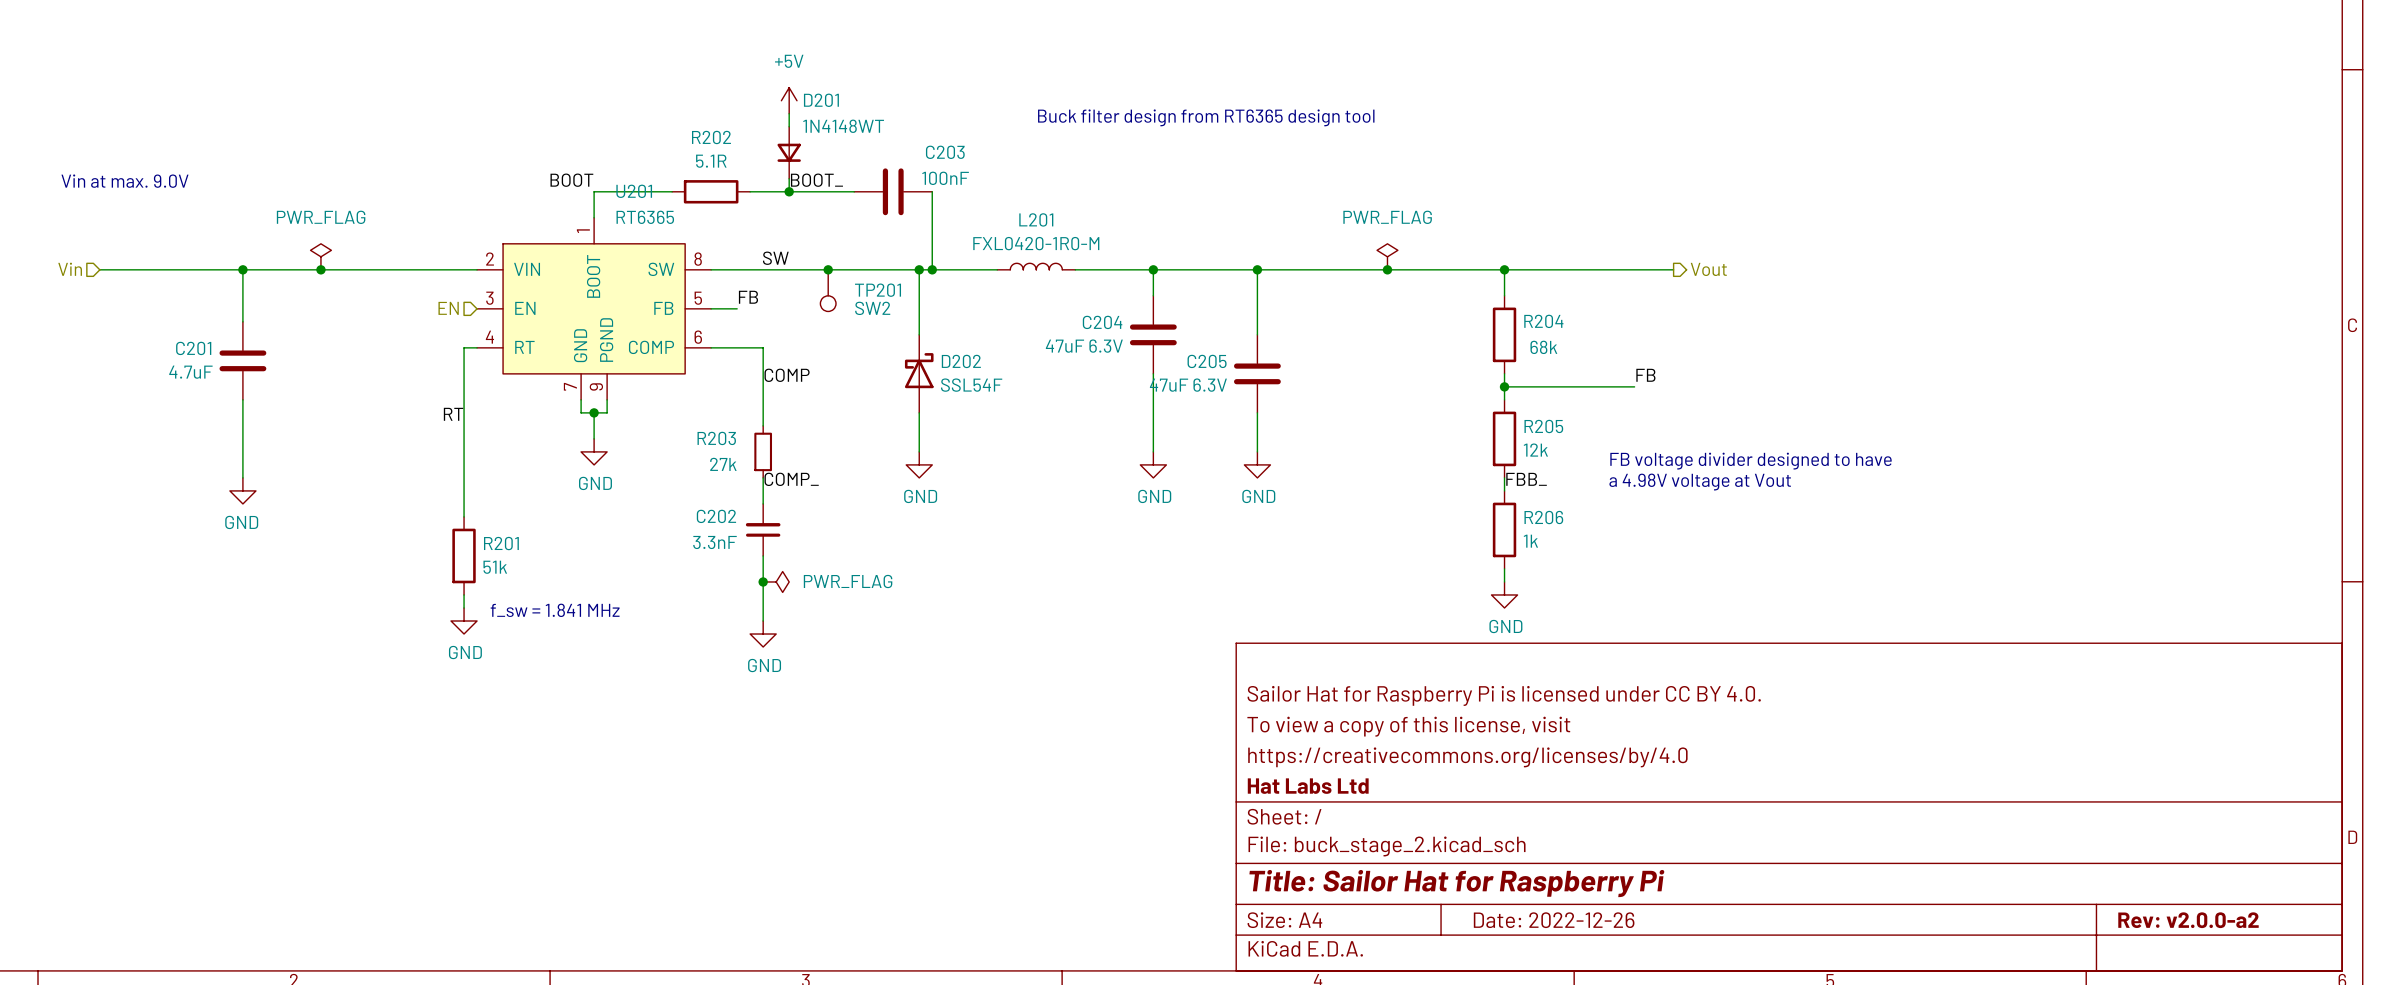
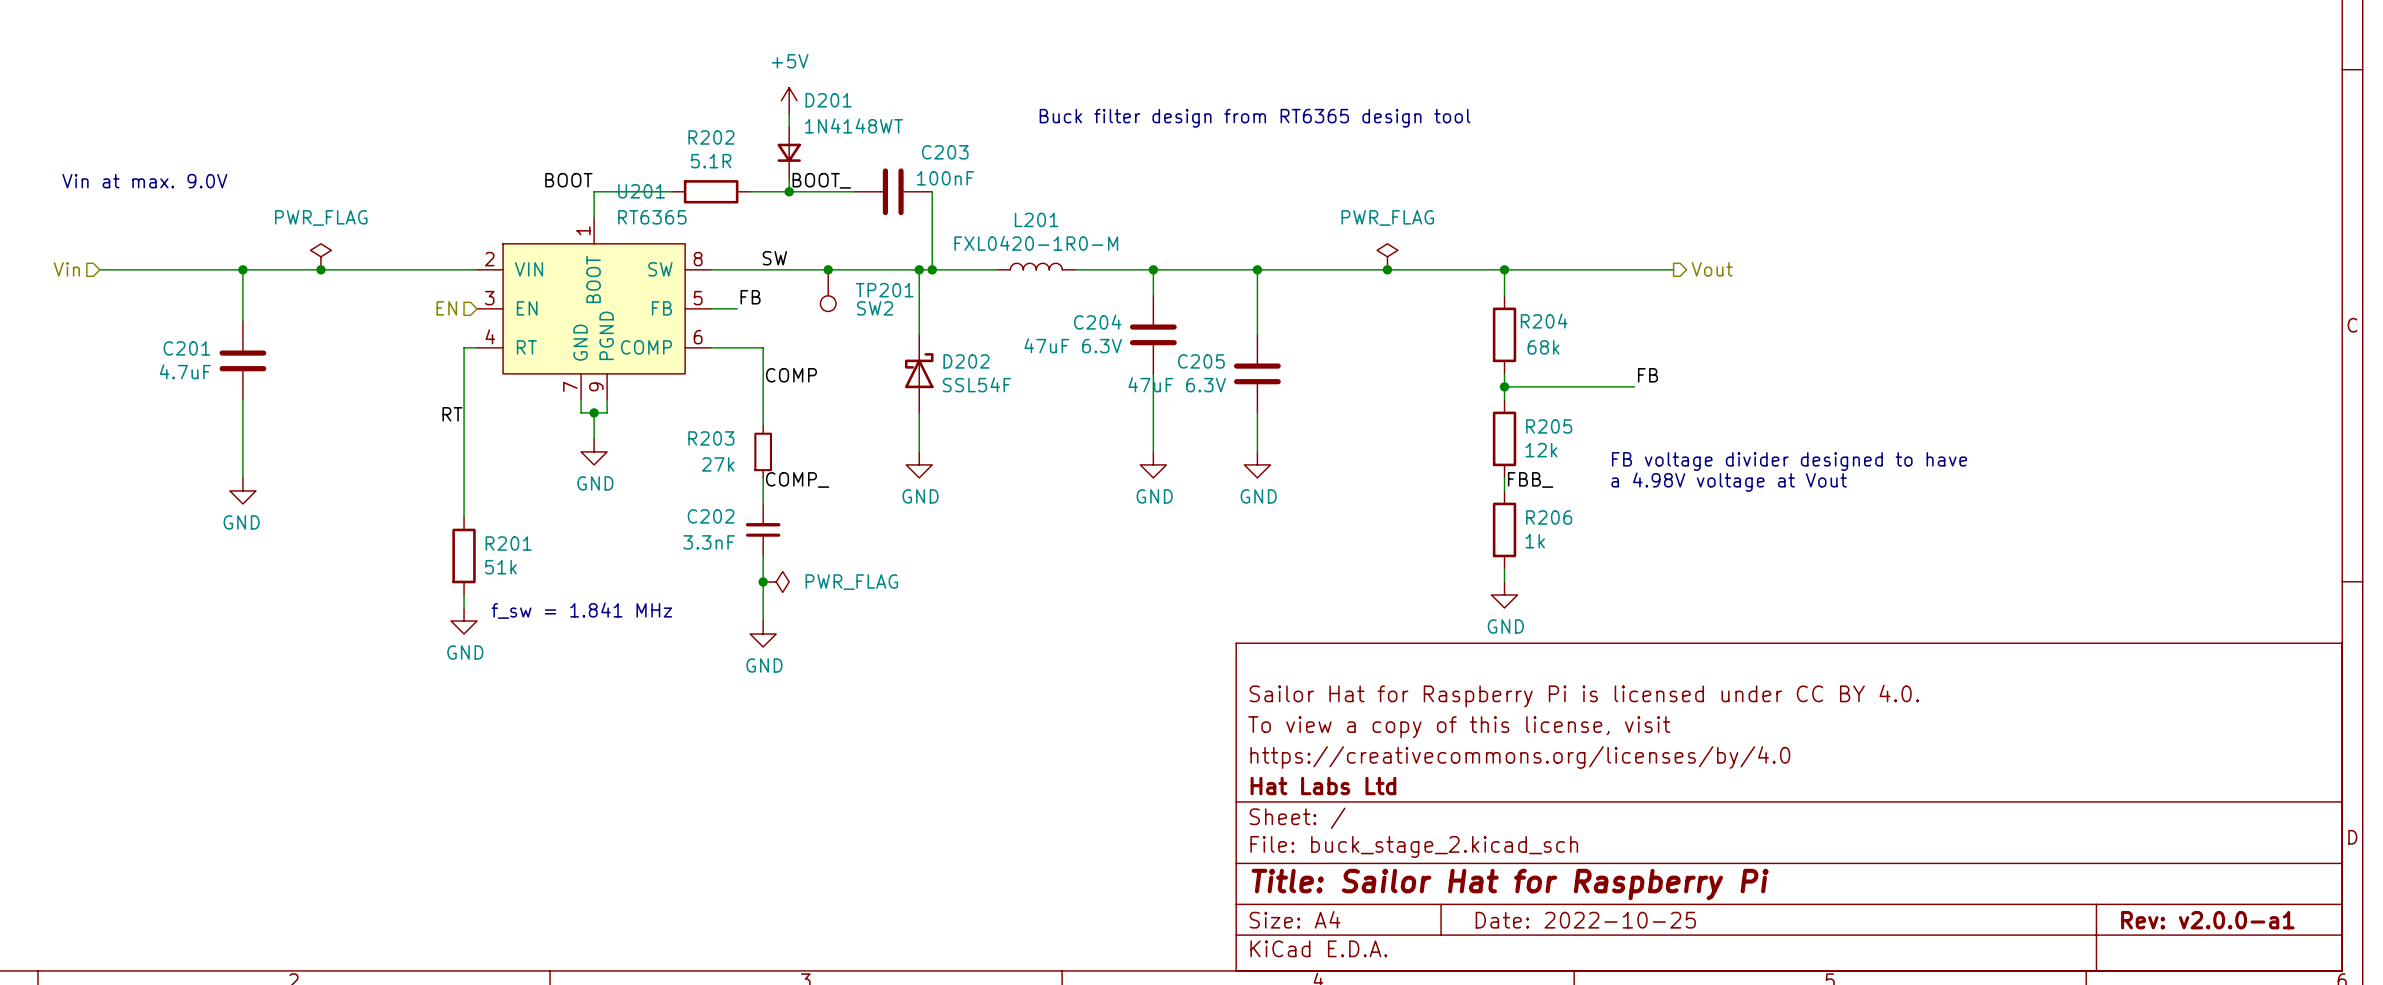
title block: Date: 2022-12-26 (1554, 920) -> Date: 2022-10-25 (1585, 920)
title block: Rev: v2.0.0-a2 (2188, 920) -> Rev: v2.0.0-a1 (2207, 920)

